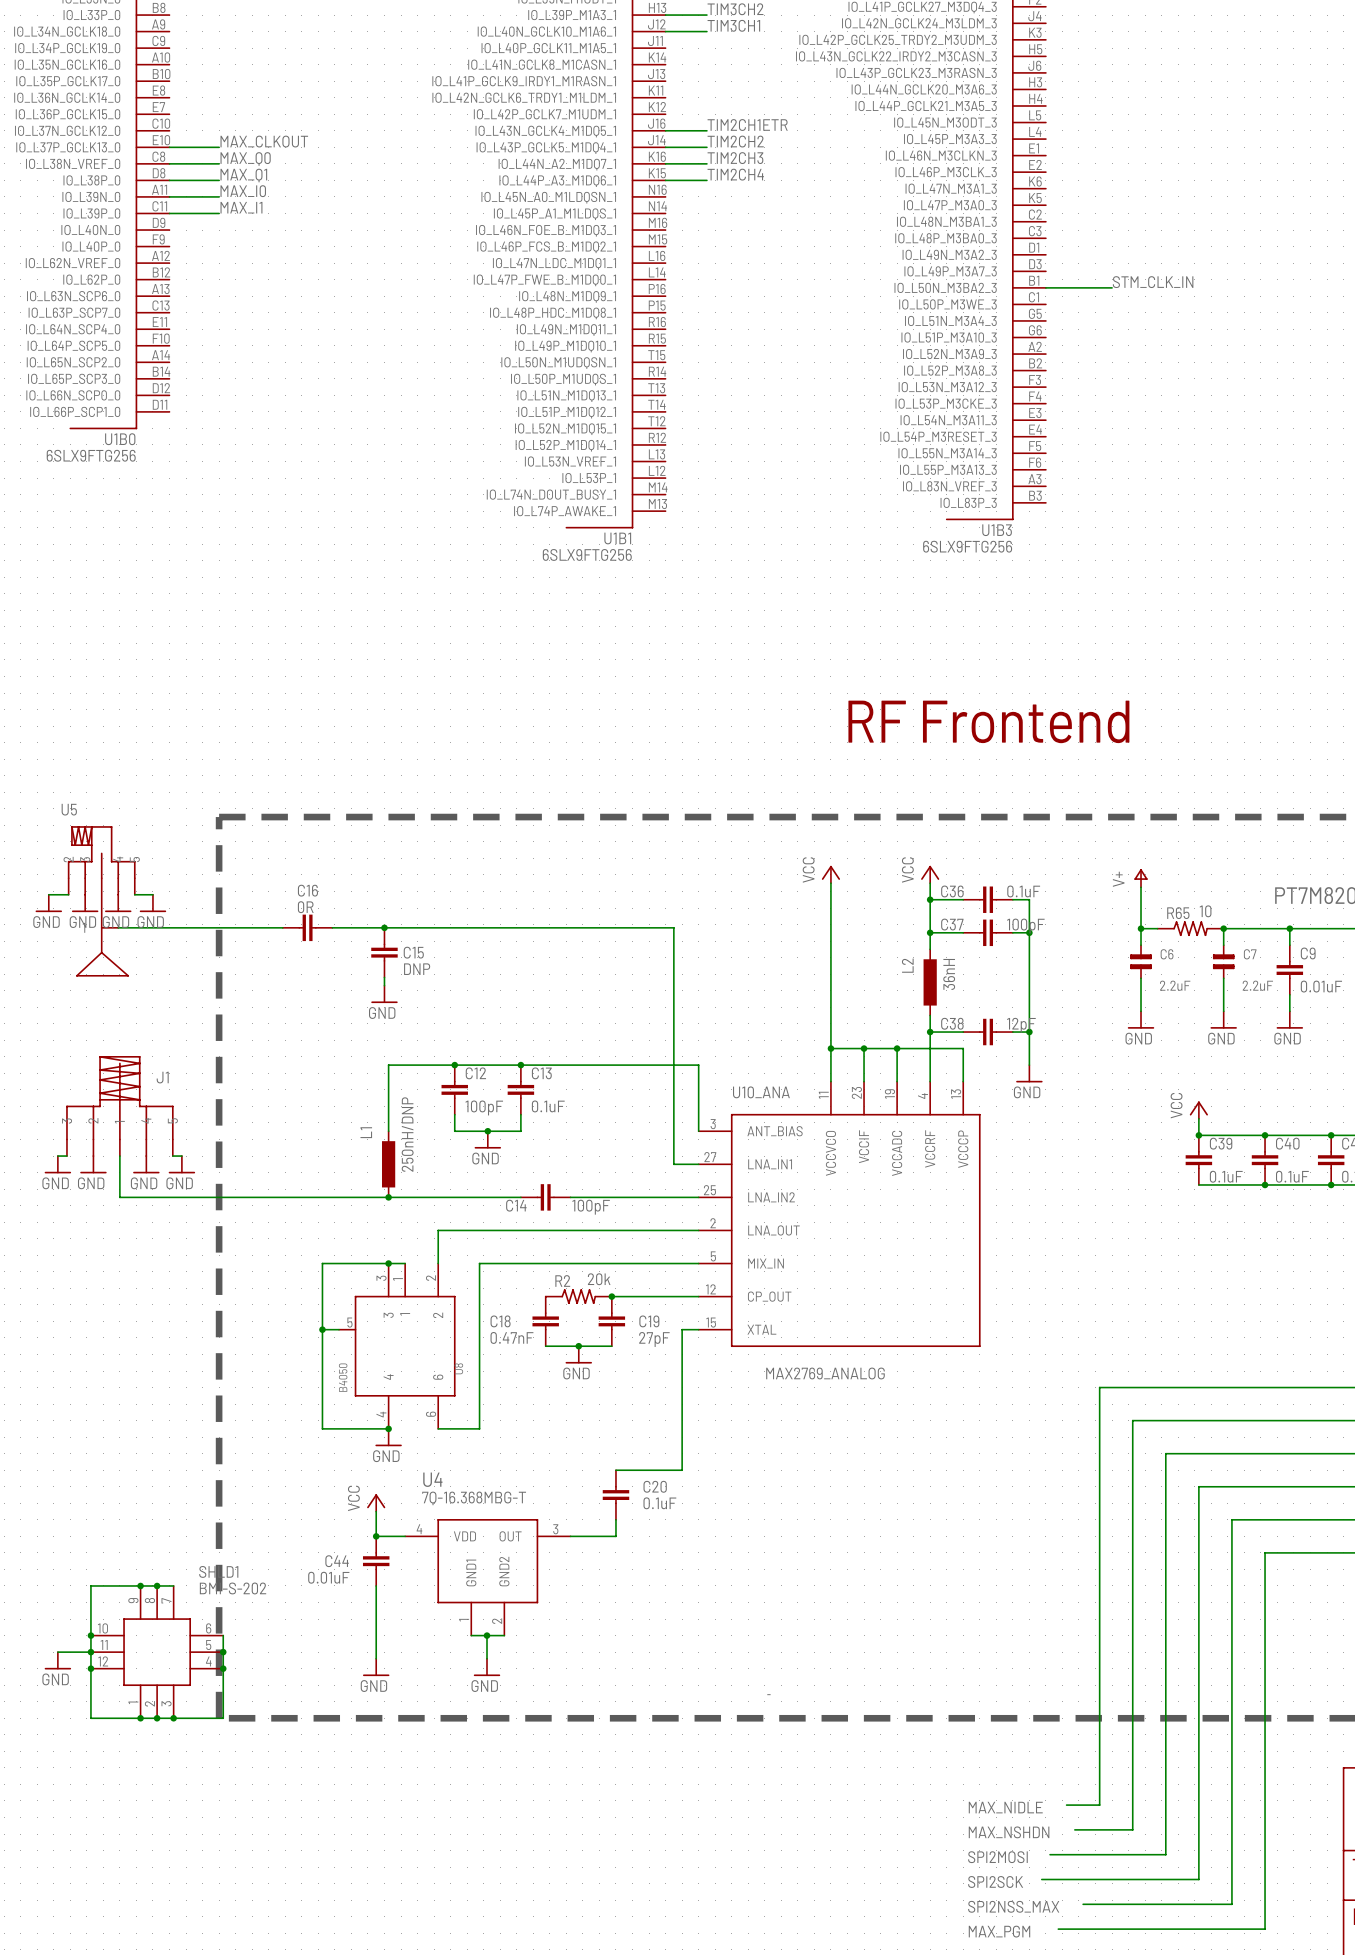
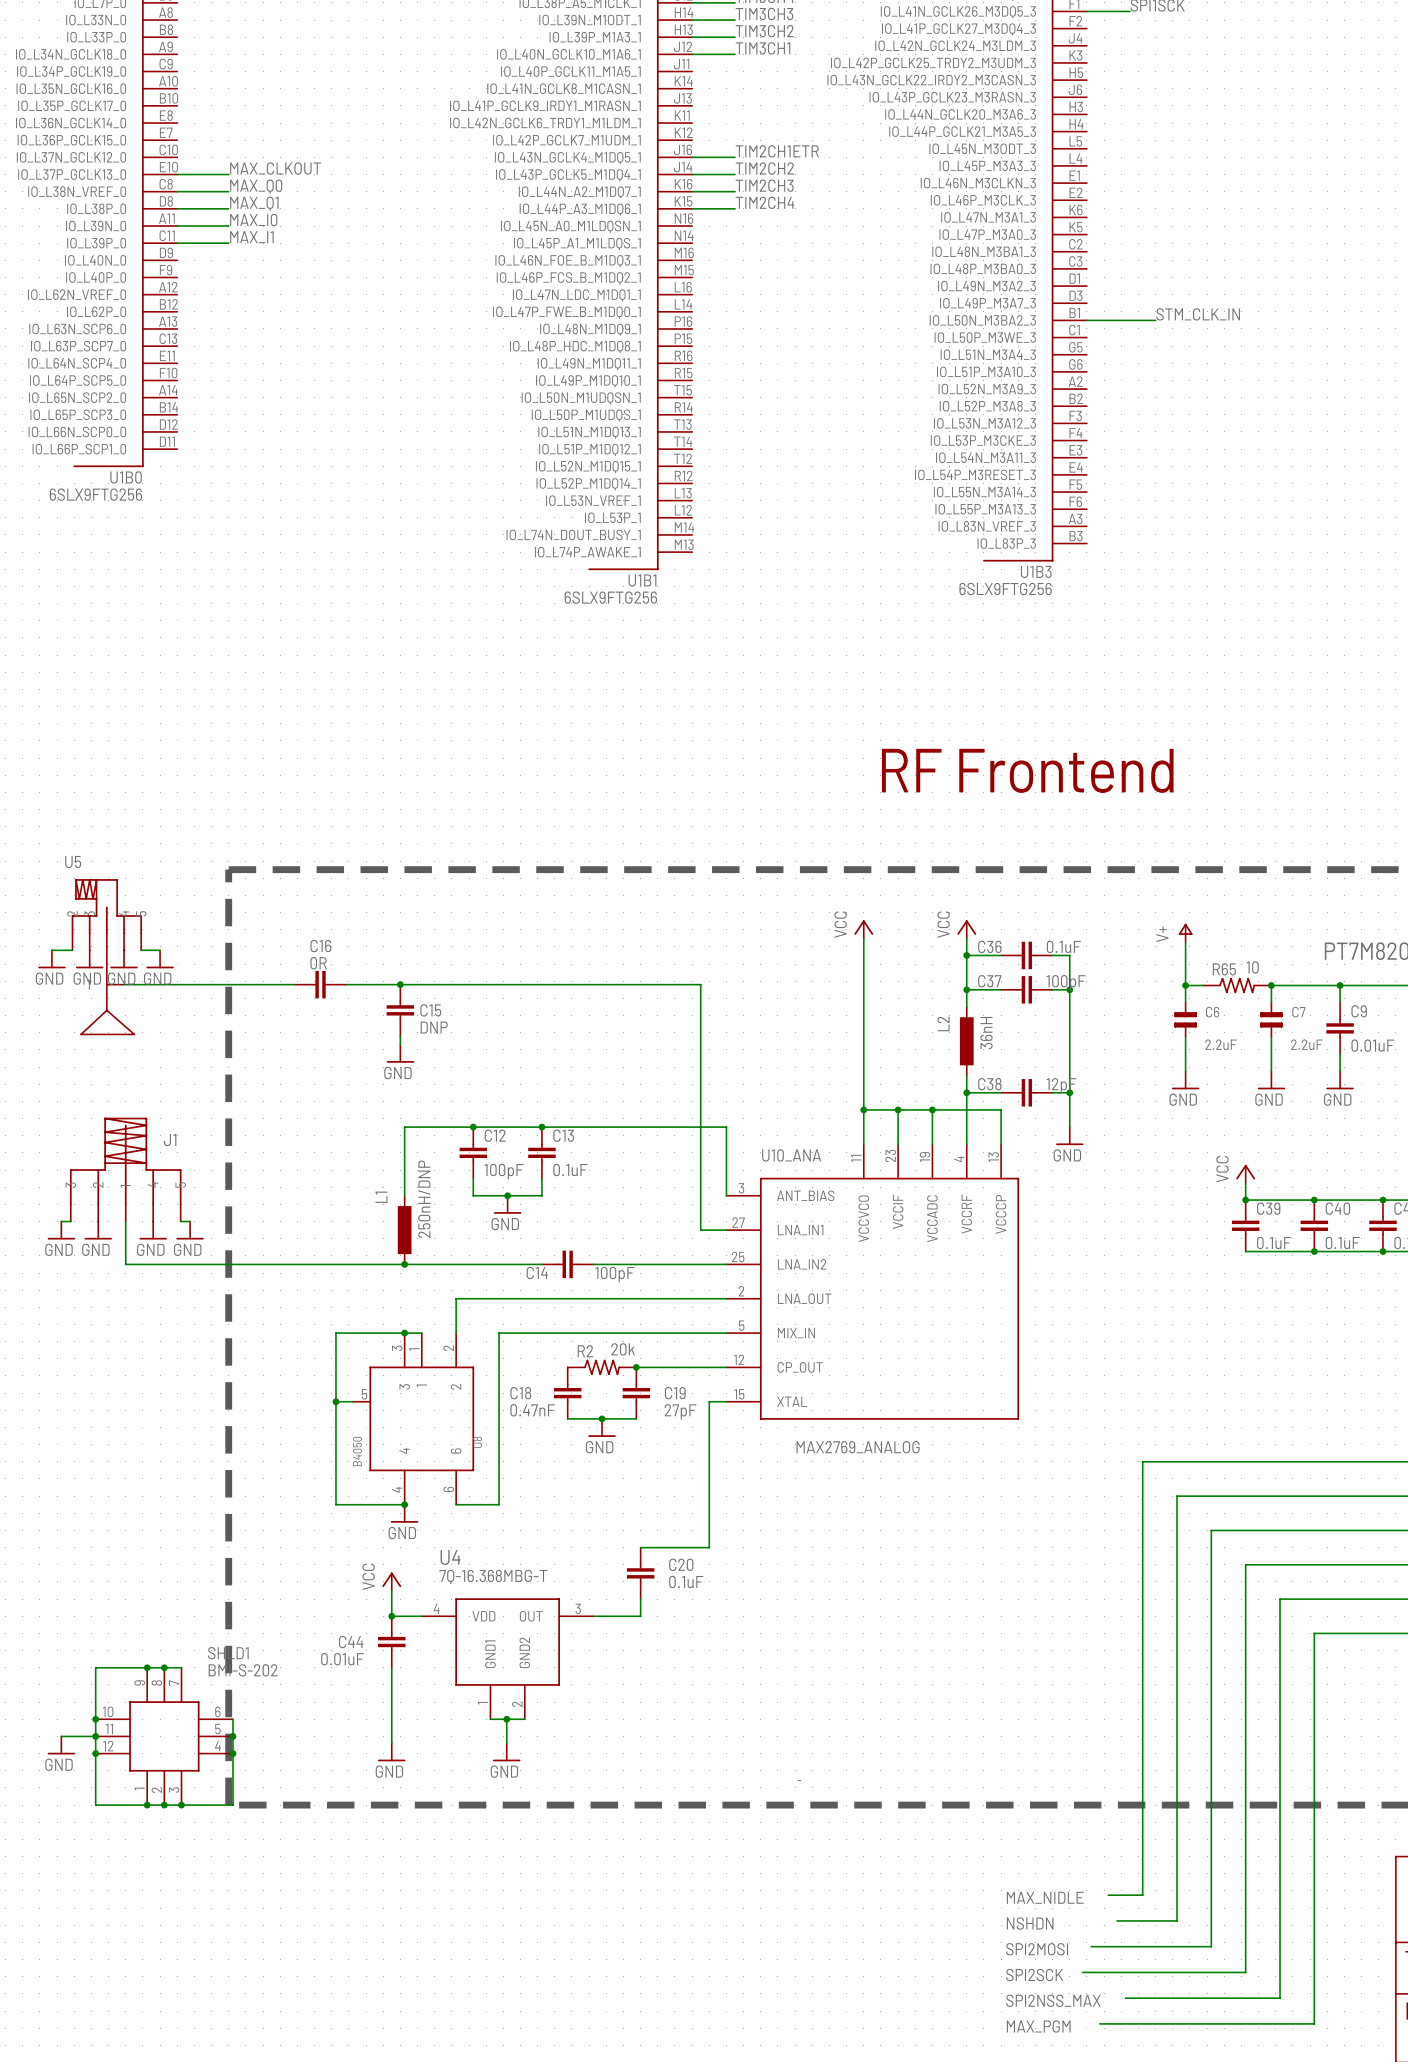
label: MAX_NSHDN (1009, 1832) -> NSHDN (1030, 1923)

